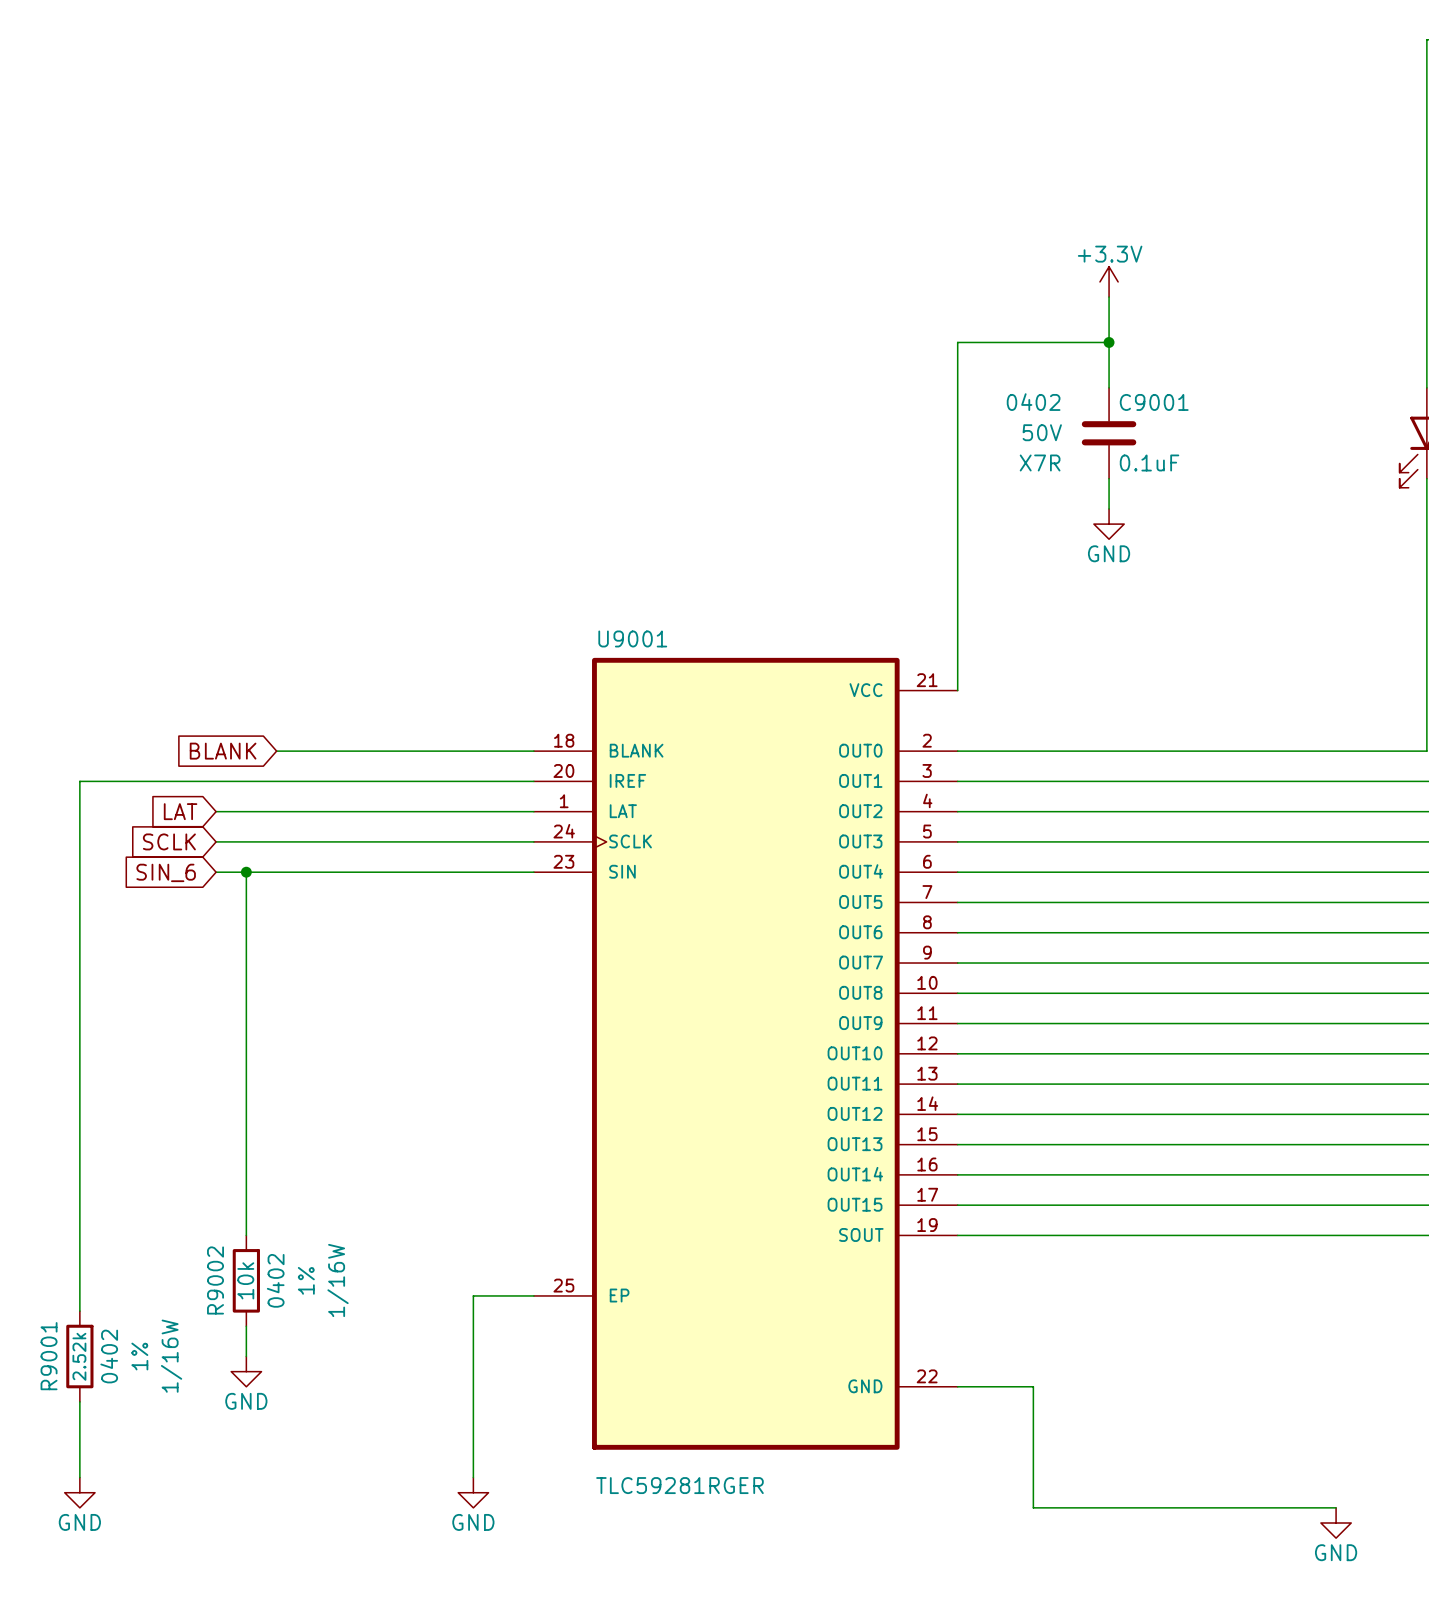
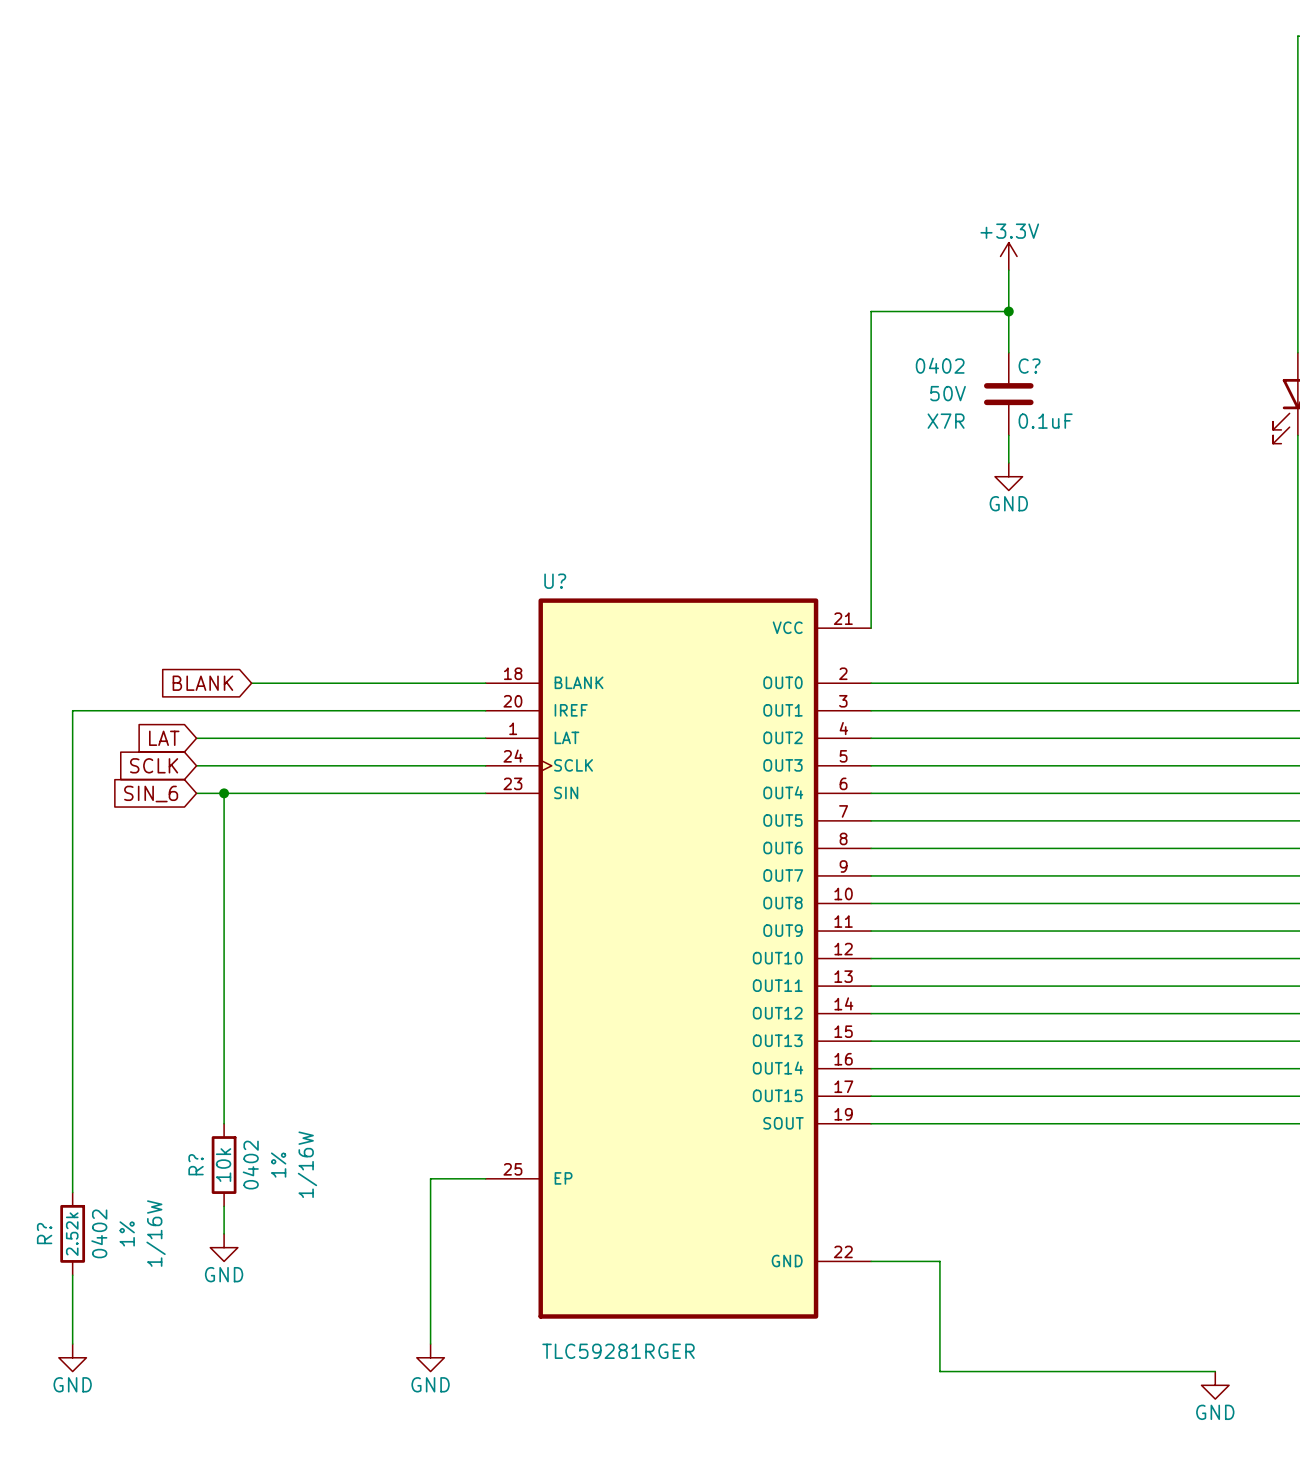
C9001 name: C9001 (1154, 402) -> C? (1029, 366)
U9001 name: U9001 (632, 638) -> U? (555, 581)
R9002 name: R9002 (215, 1280) -> R? (196, 1164)
R9001 name: R9001 (49, 1356) -> R? (44, 1233)

